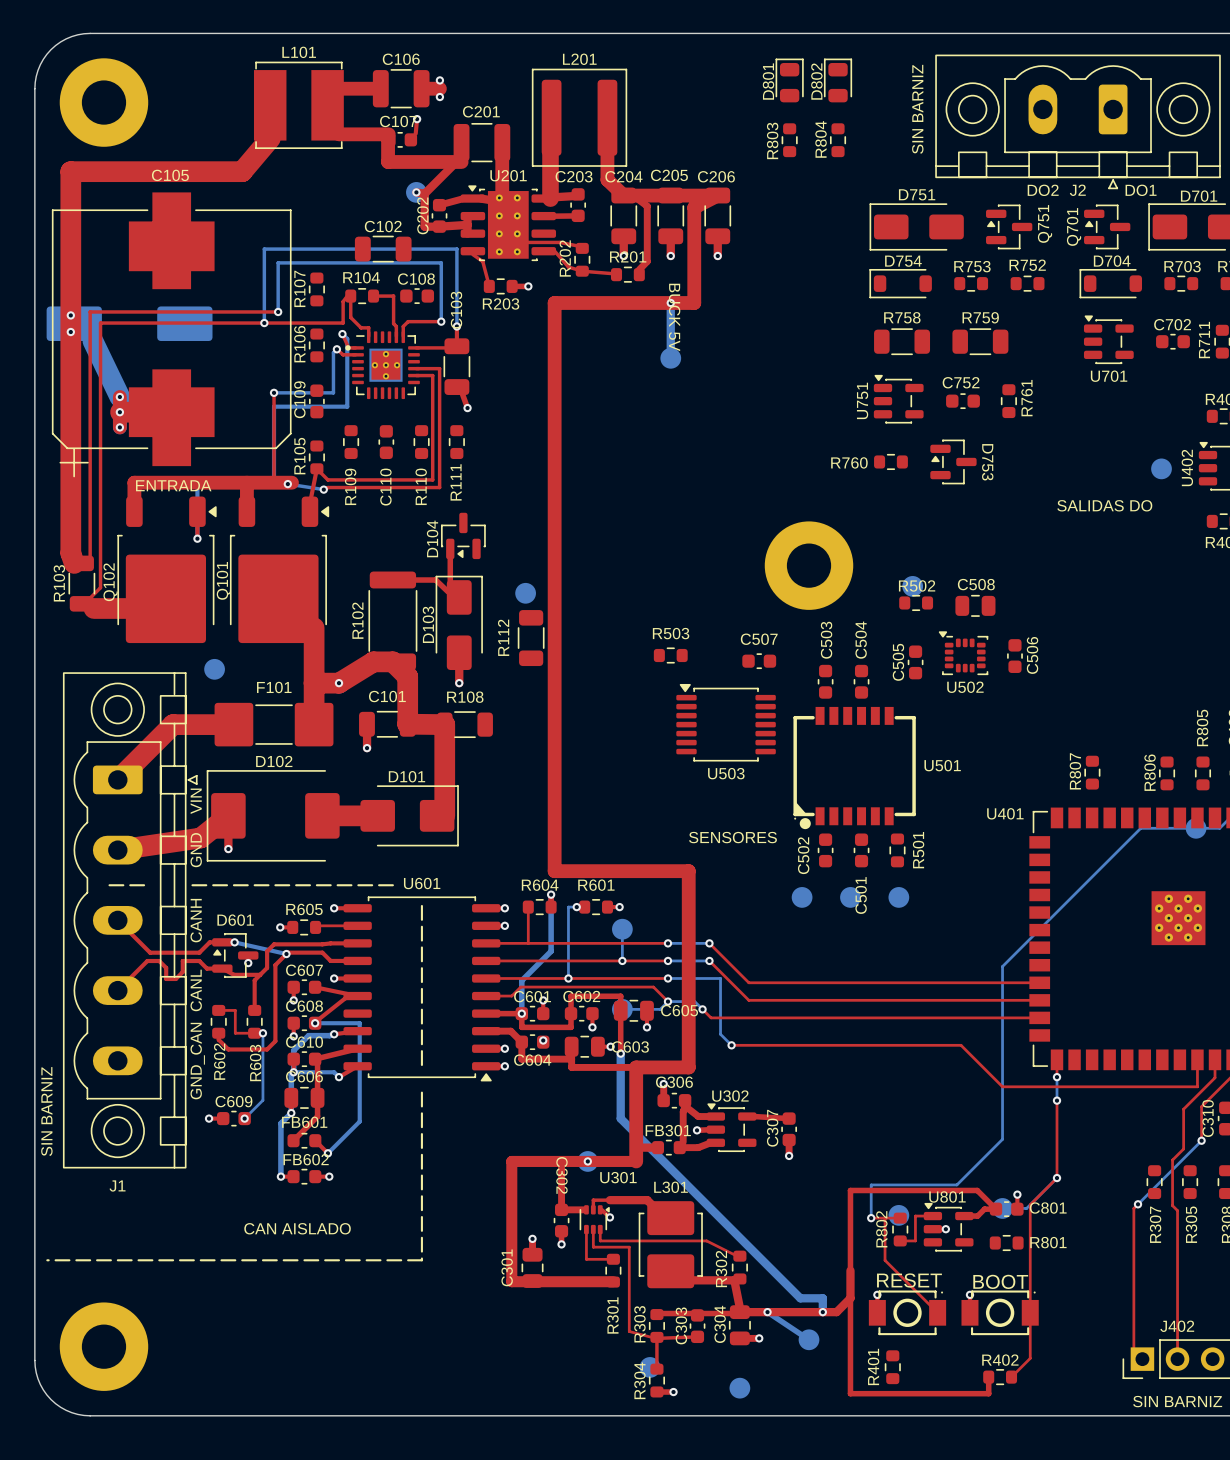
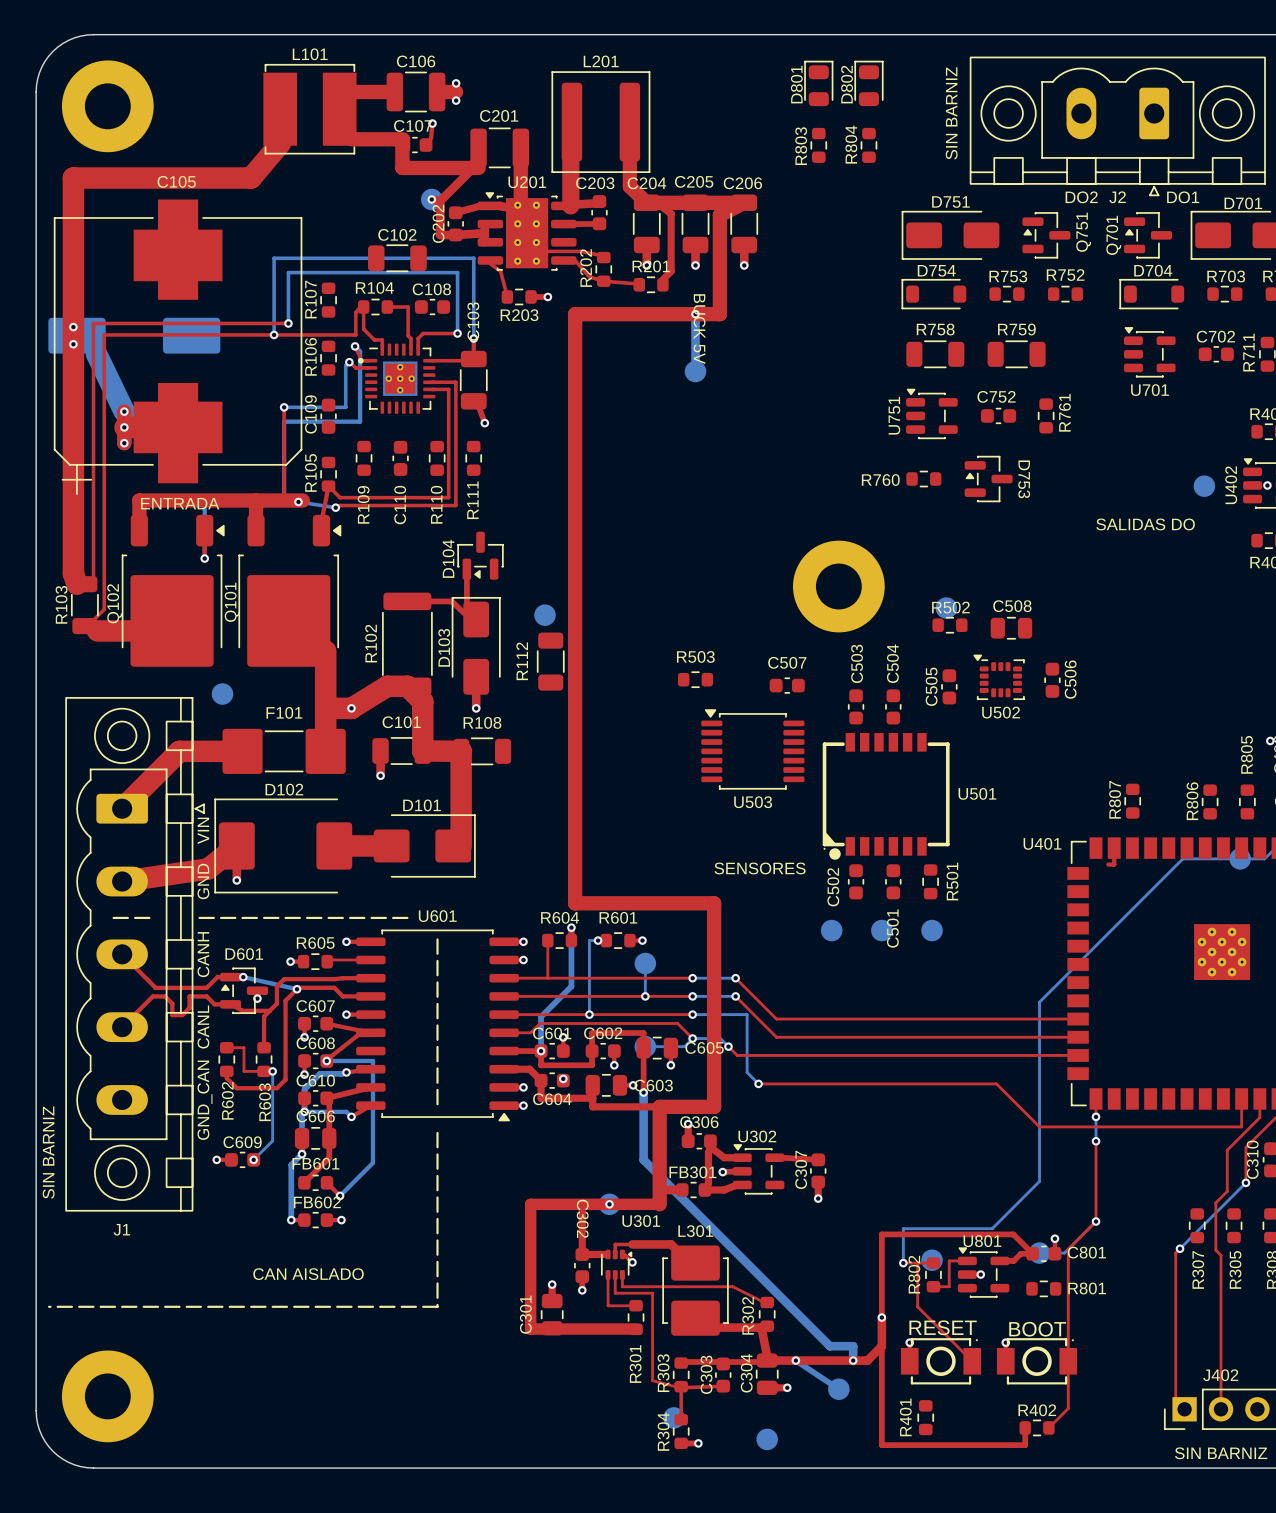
via: none -> (1267, 485)
via: none -> (1270, 740)
top track: none -> (1114, 848) (1114, 864) (1108, 864)
via: none -> (881, 1317)

